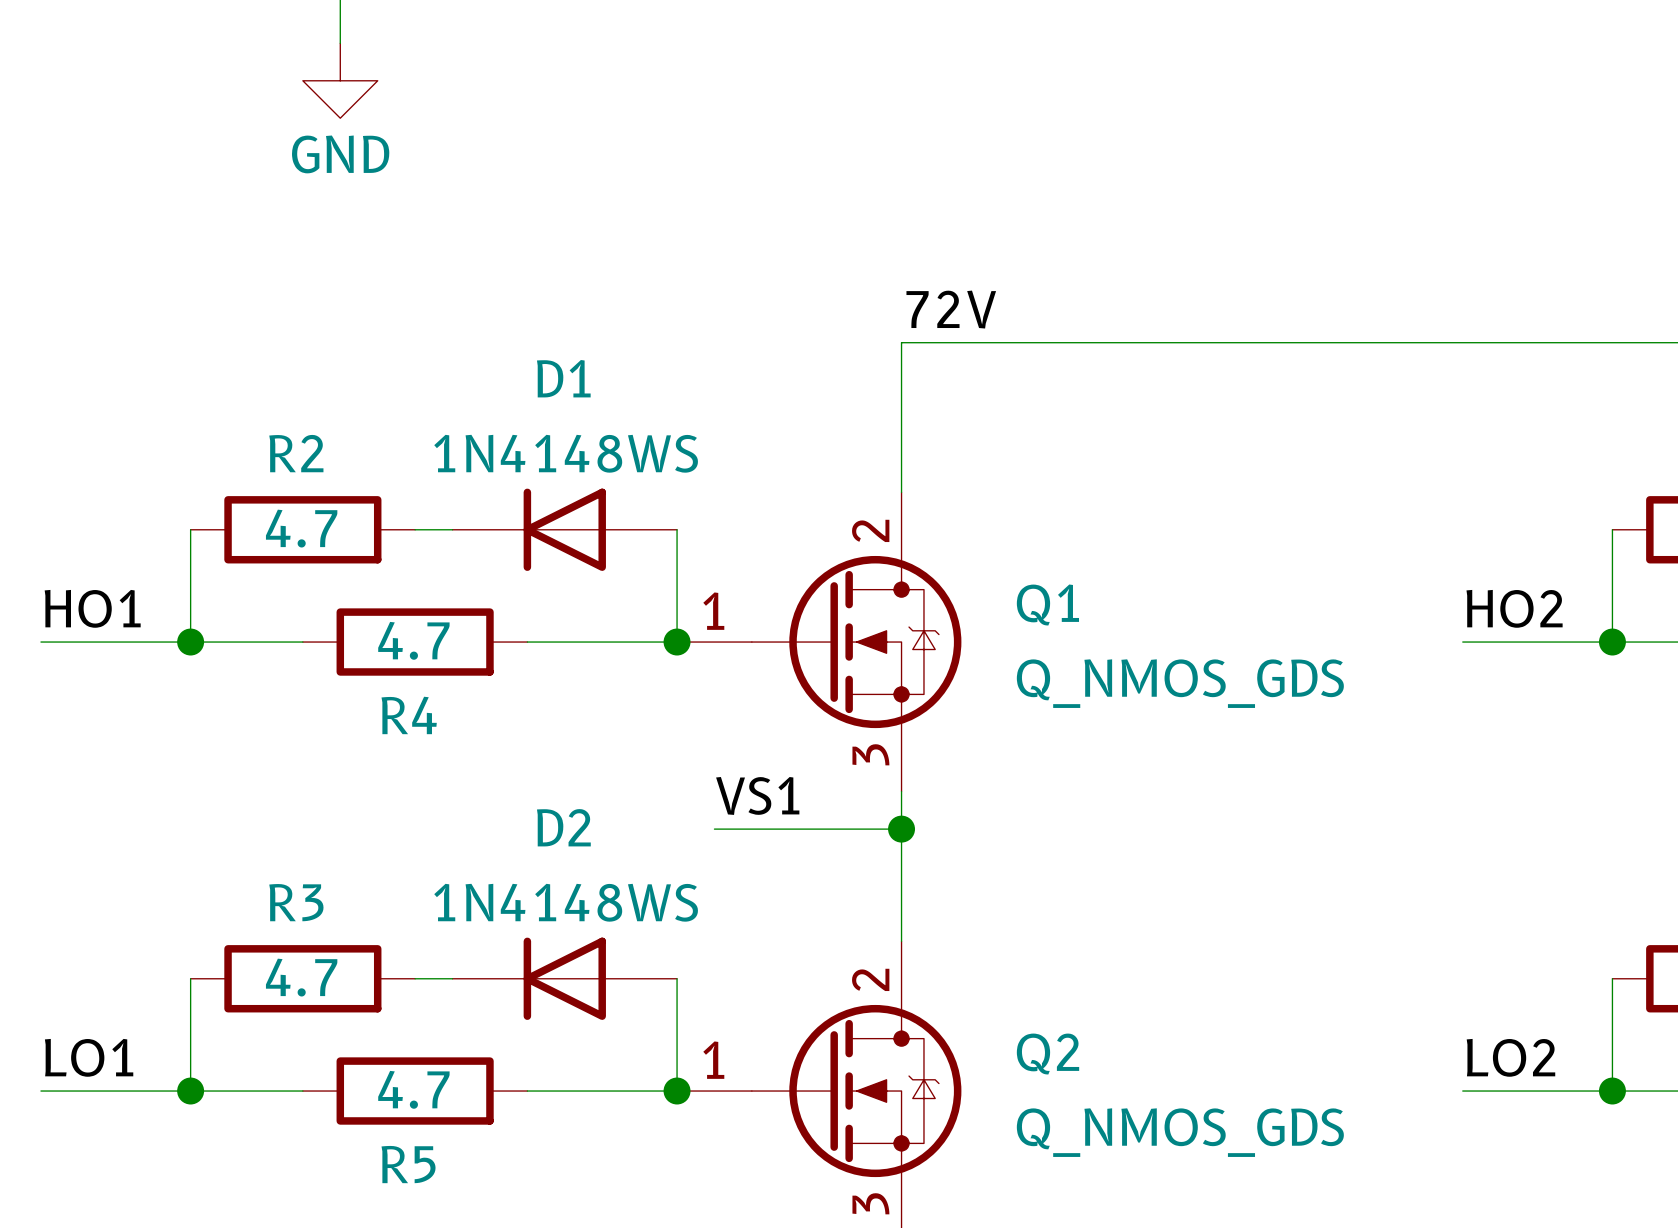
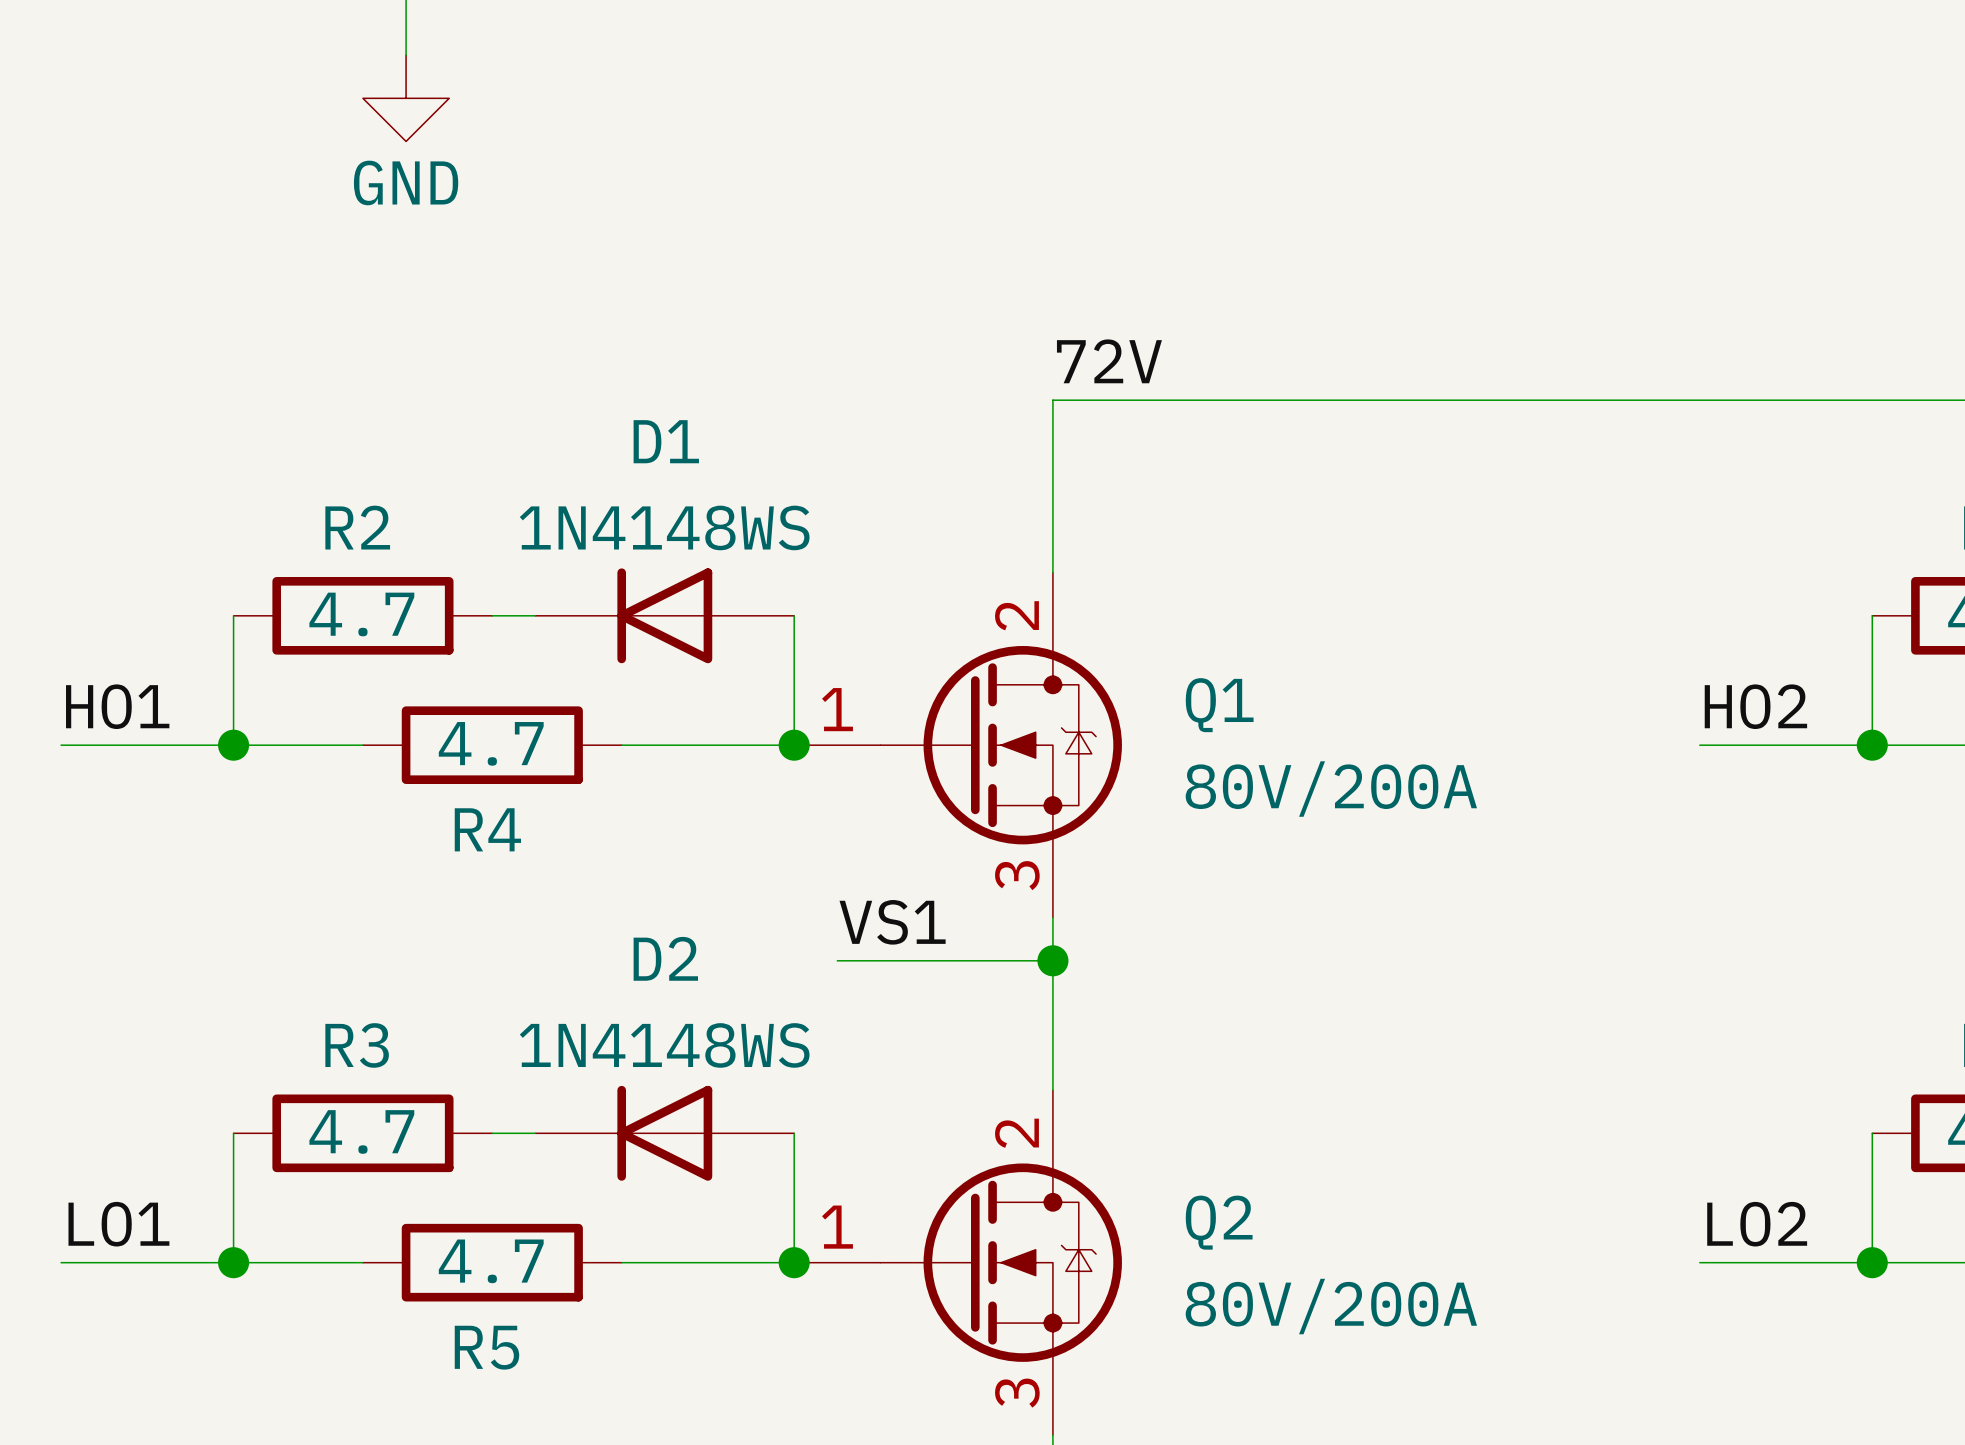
Q1 value: Q_NMOS_GDS (1180, 683) -> 80V/200A (1331, 789)
Q2 value: Q_NMOS_GDS (1180, 1132) -> 80V/200A (1331, 1306)

